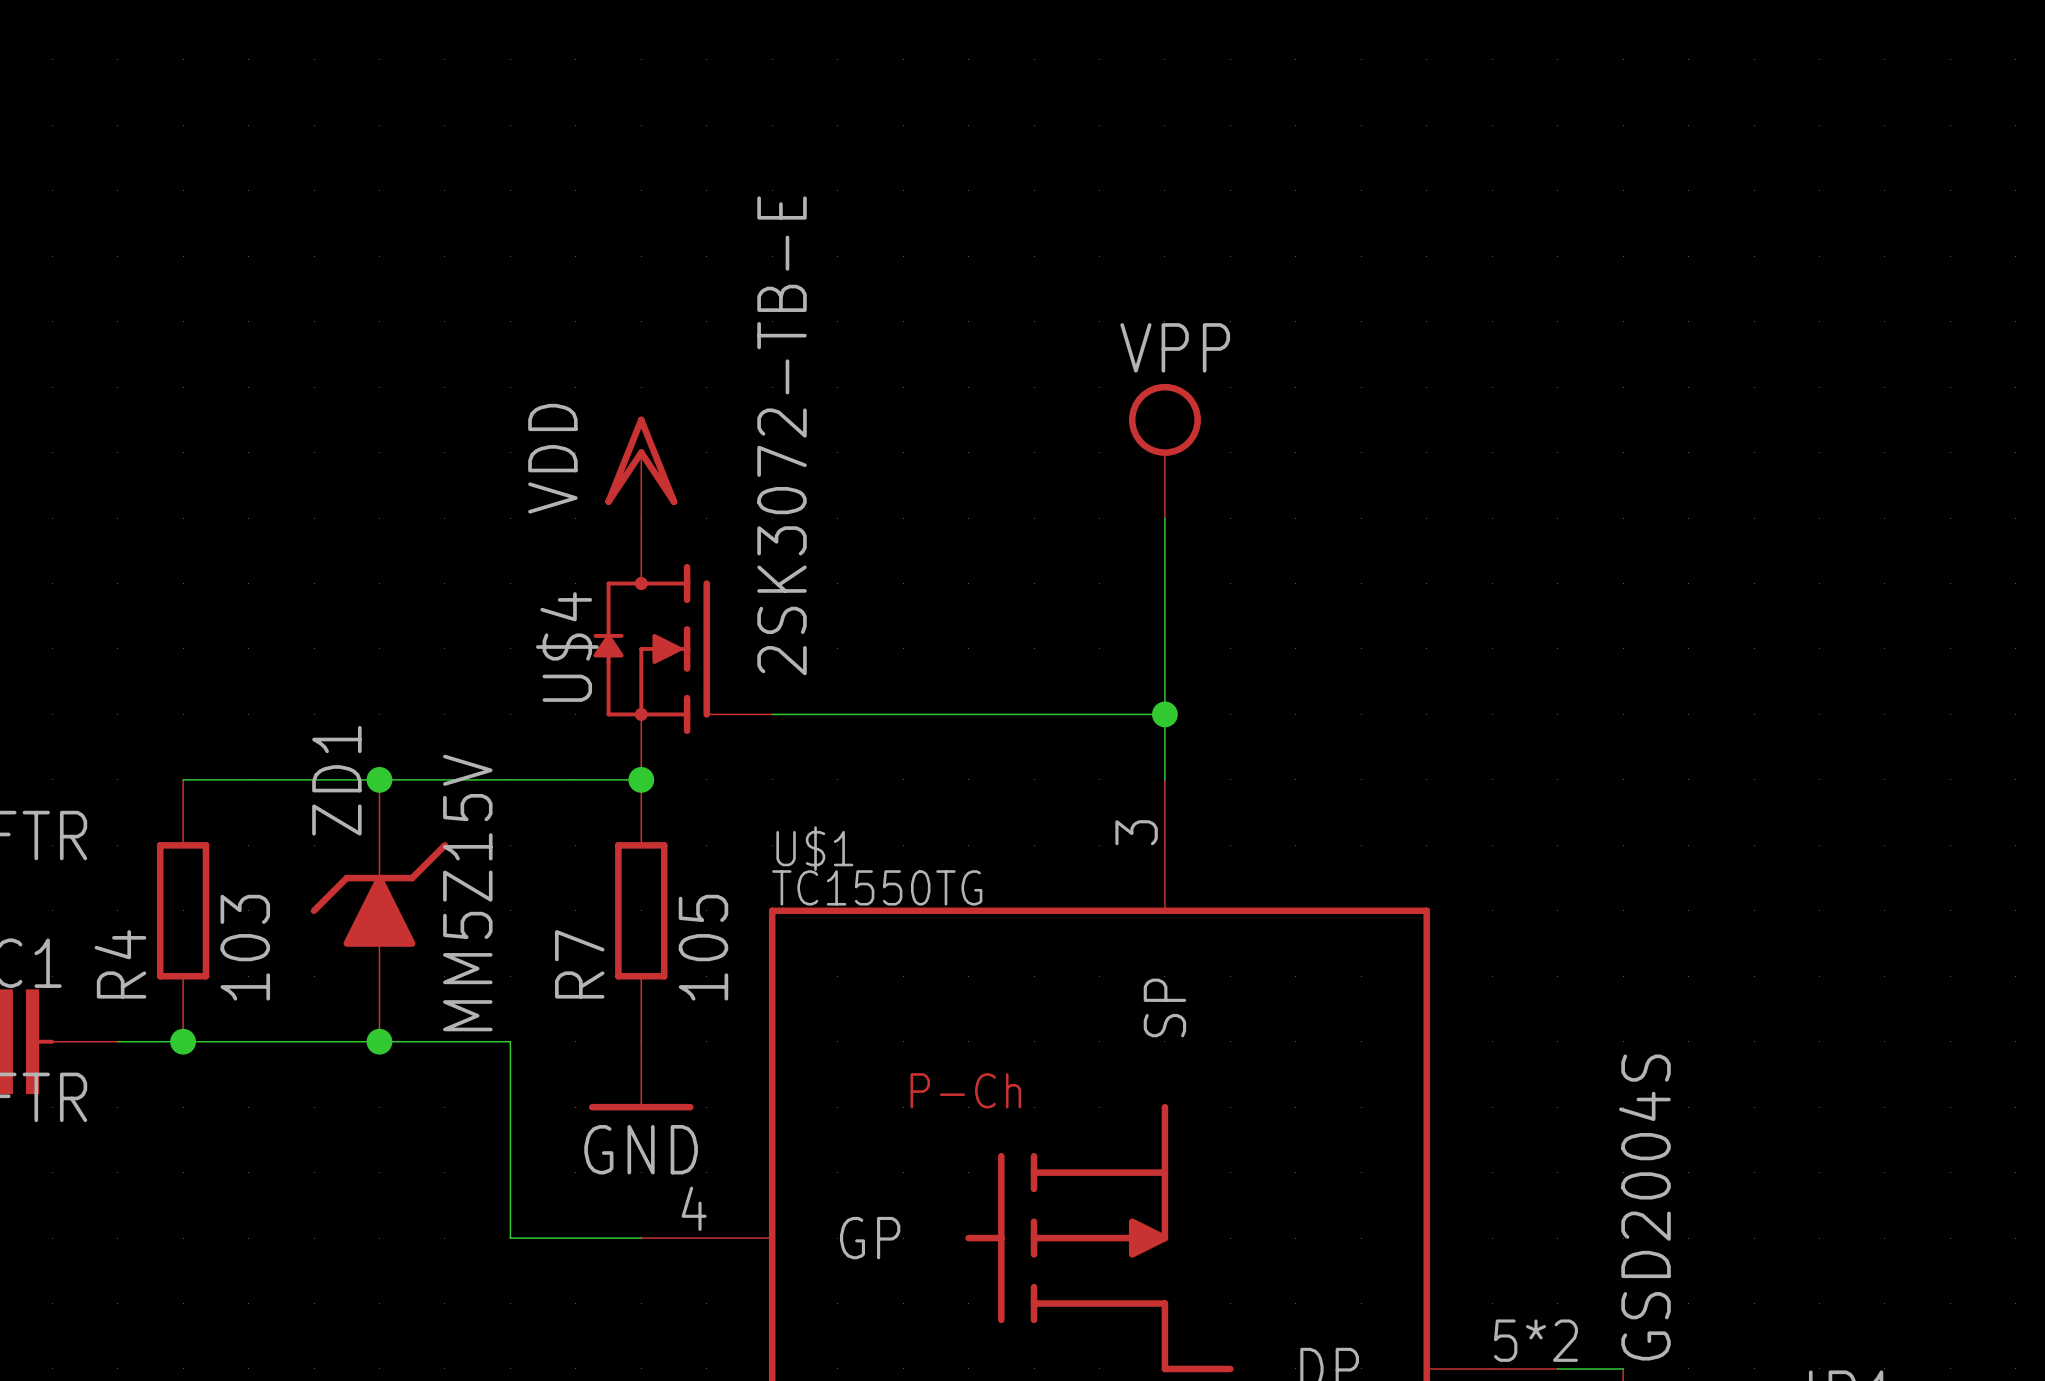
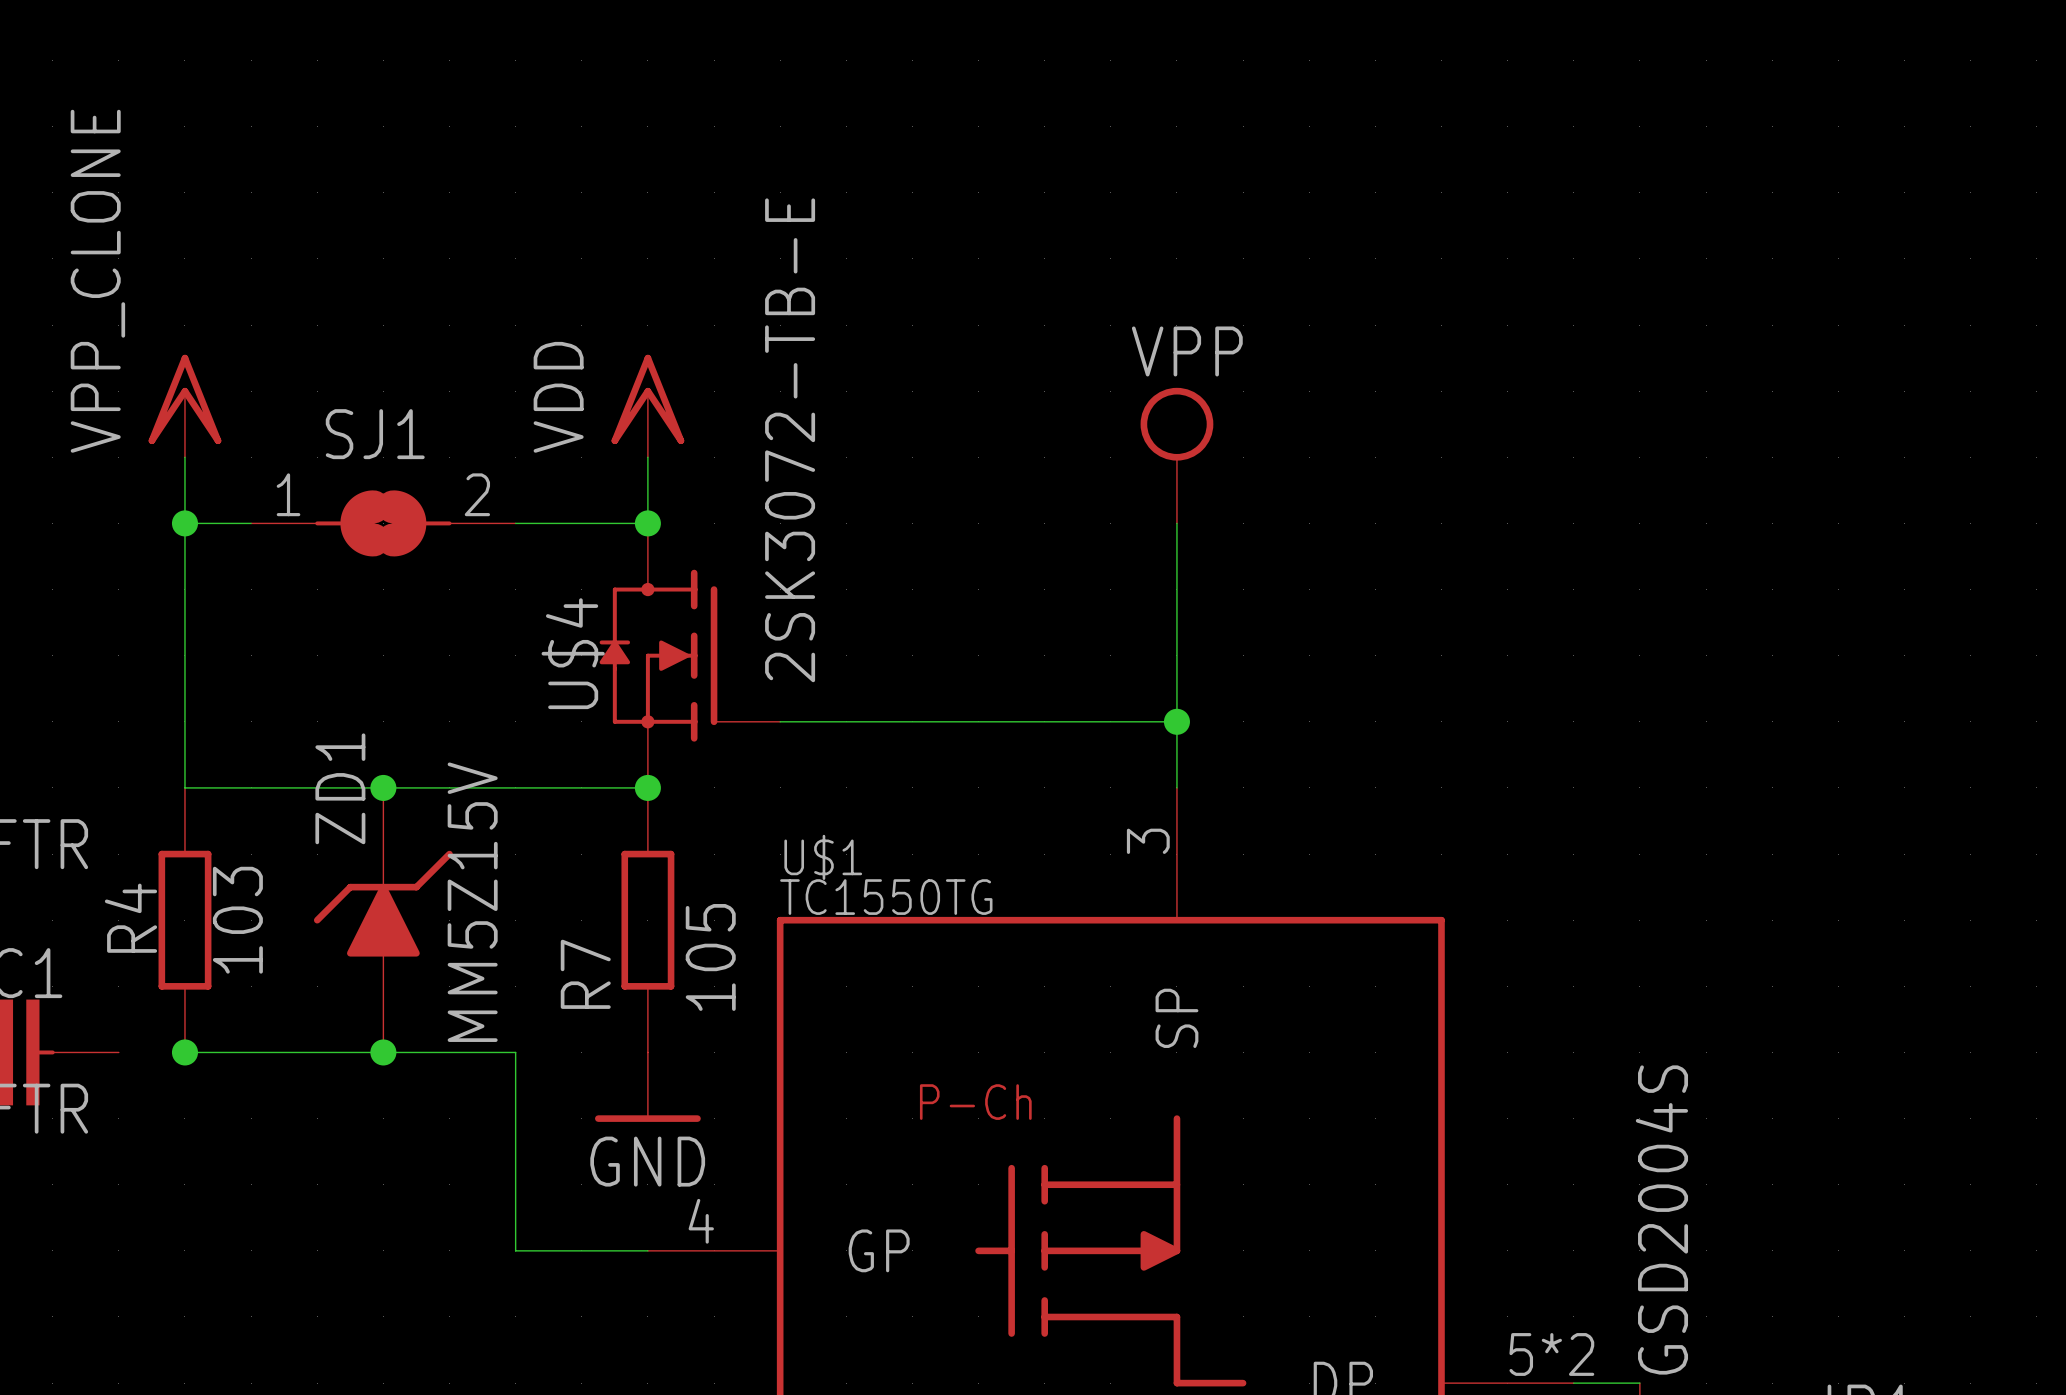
power symbol: none -> VPP_CLONE (184, 406)
wire: none -> (184, 457) (184, 787)
wire: none -> (647, 457) (647, 523) (515, 523)
power symbol position: VDD (641, 467) -> VDD (647, 406)
junction: none -> (184, 523)
SJ1: none -> (383, 523)
junction: none -> (647, 523)
R4 value position: 103 (245, 947) -> 103 (237, 920)
R4 name position: R4 (120, 964) -> R4 (130, 918)
wire: (117, 1041) (183, 1041) -> (184, 523) (251, 523)

